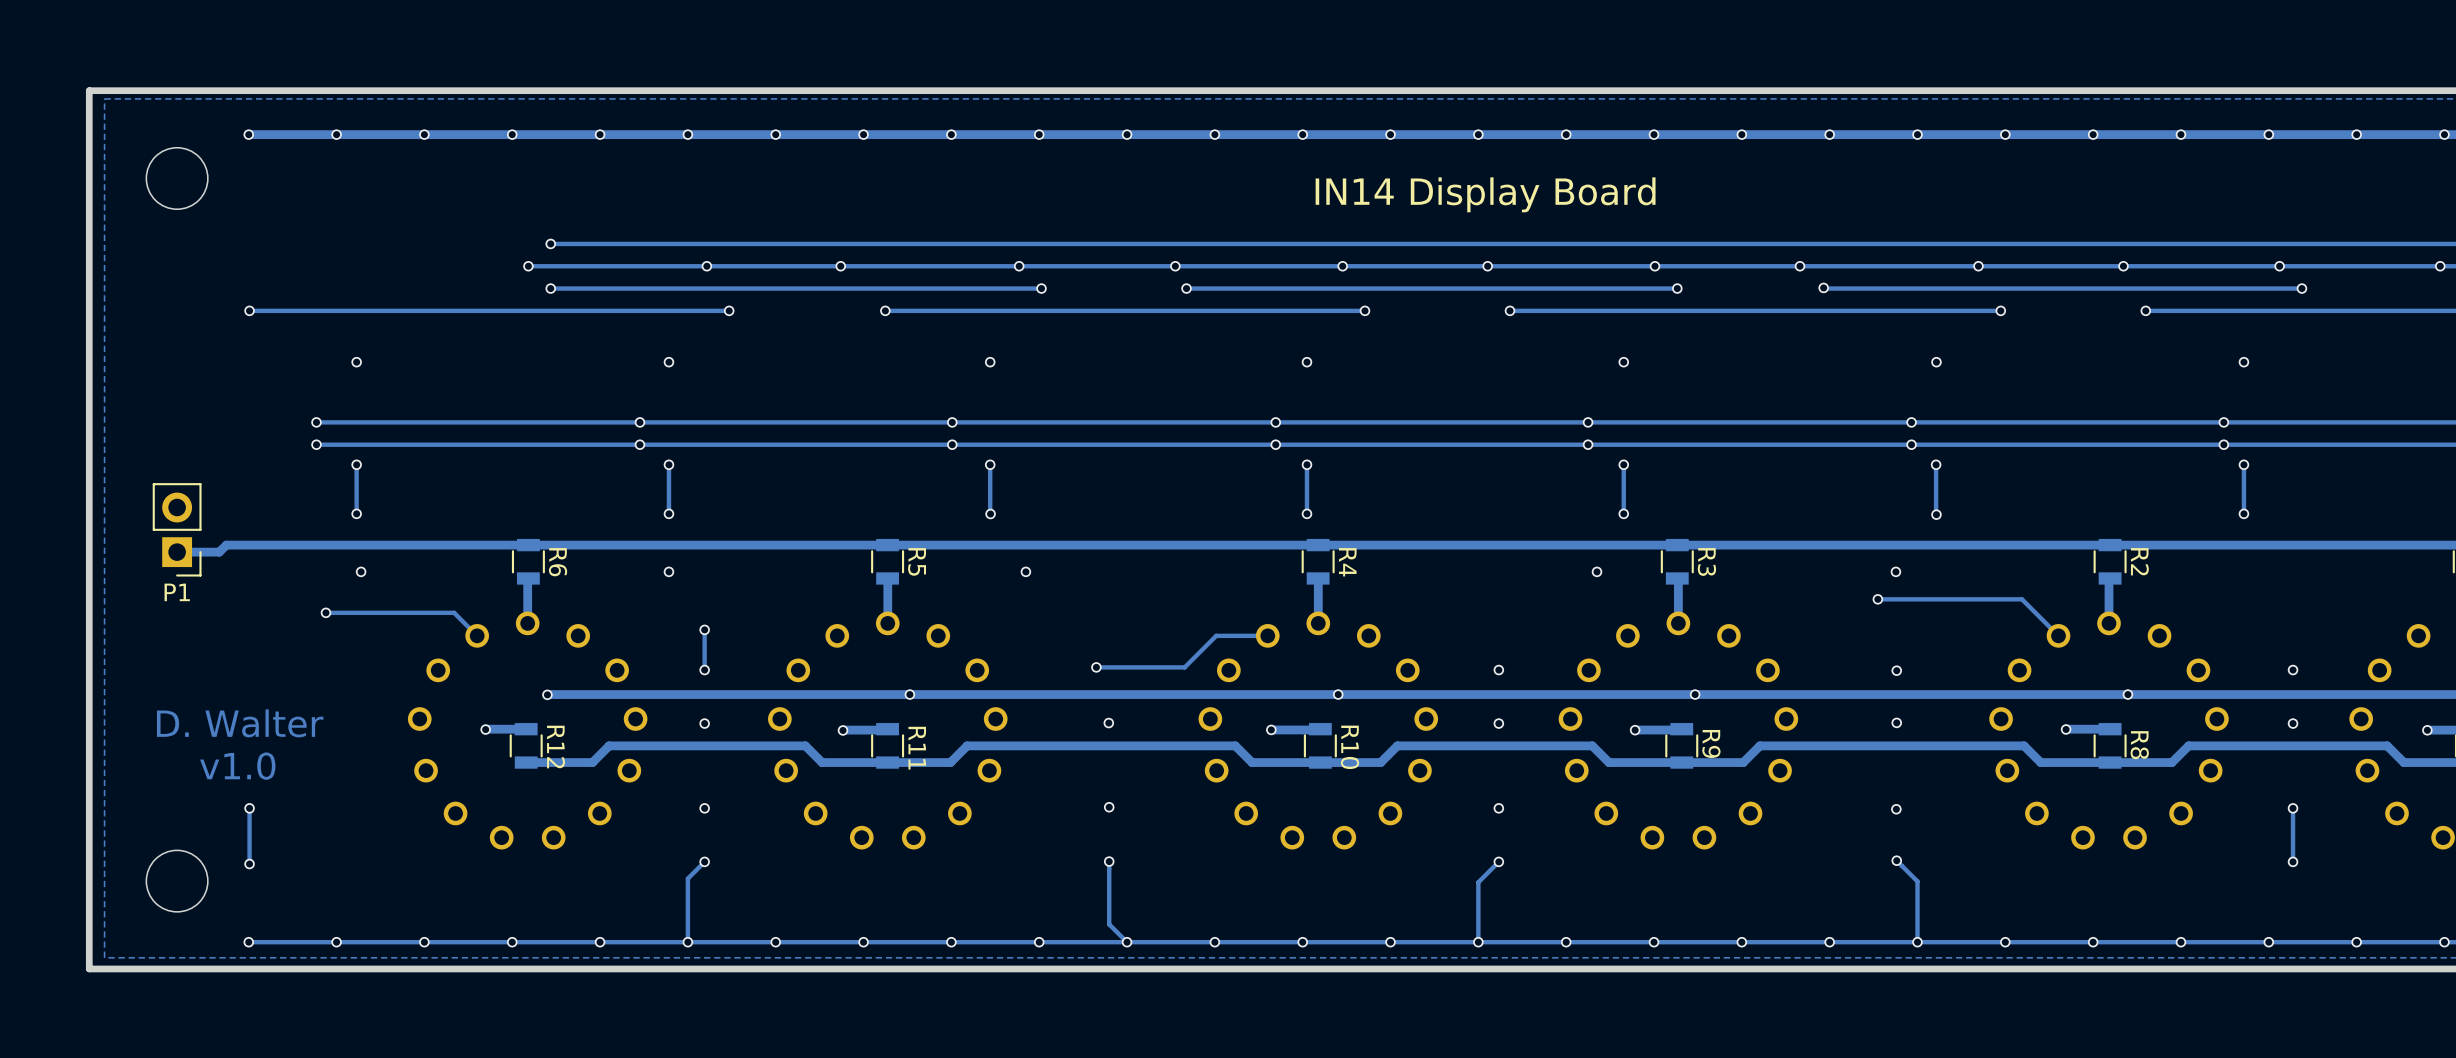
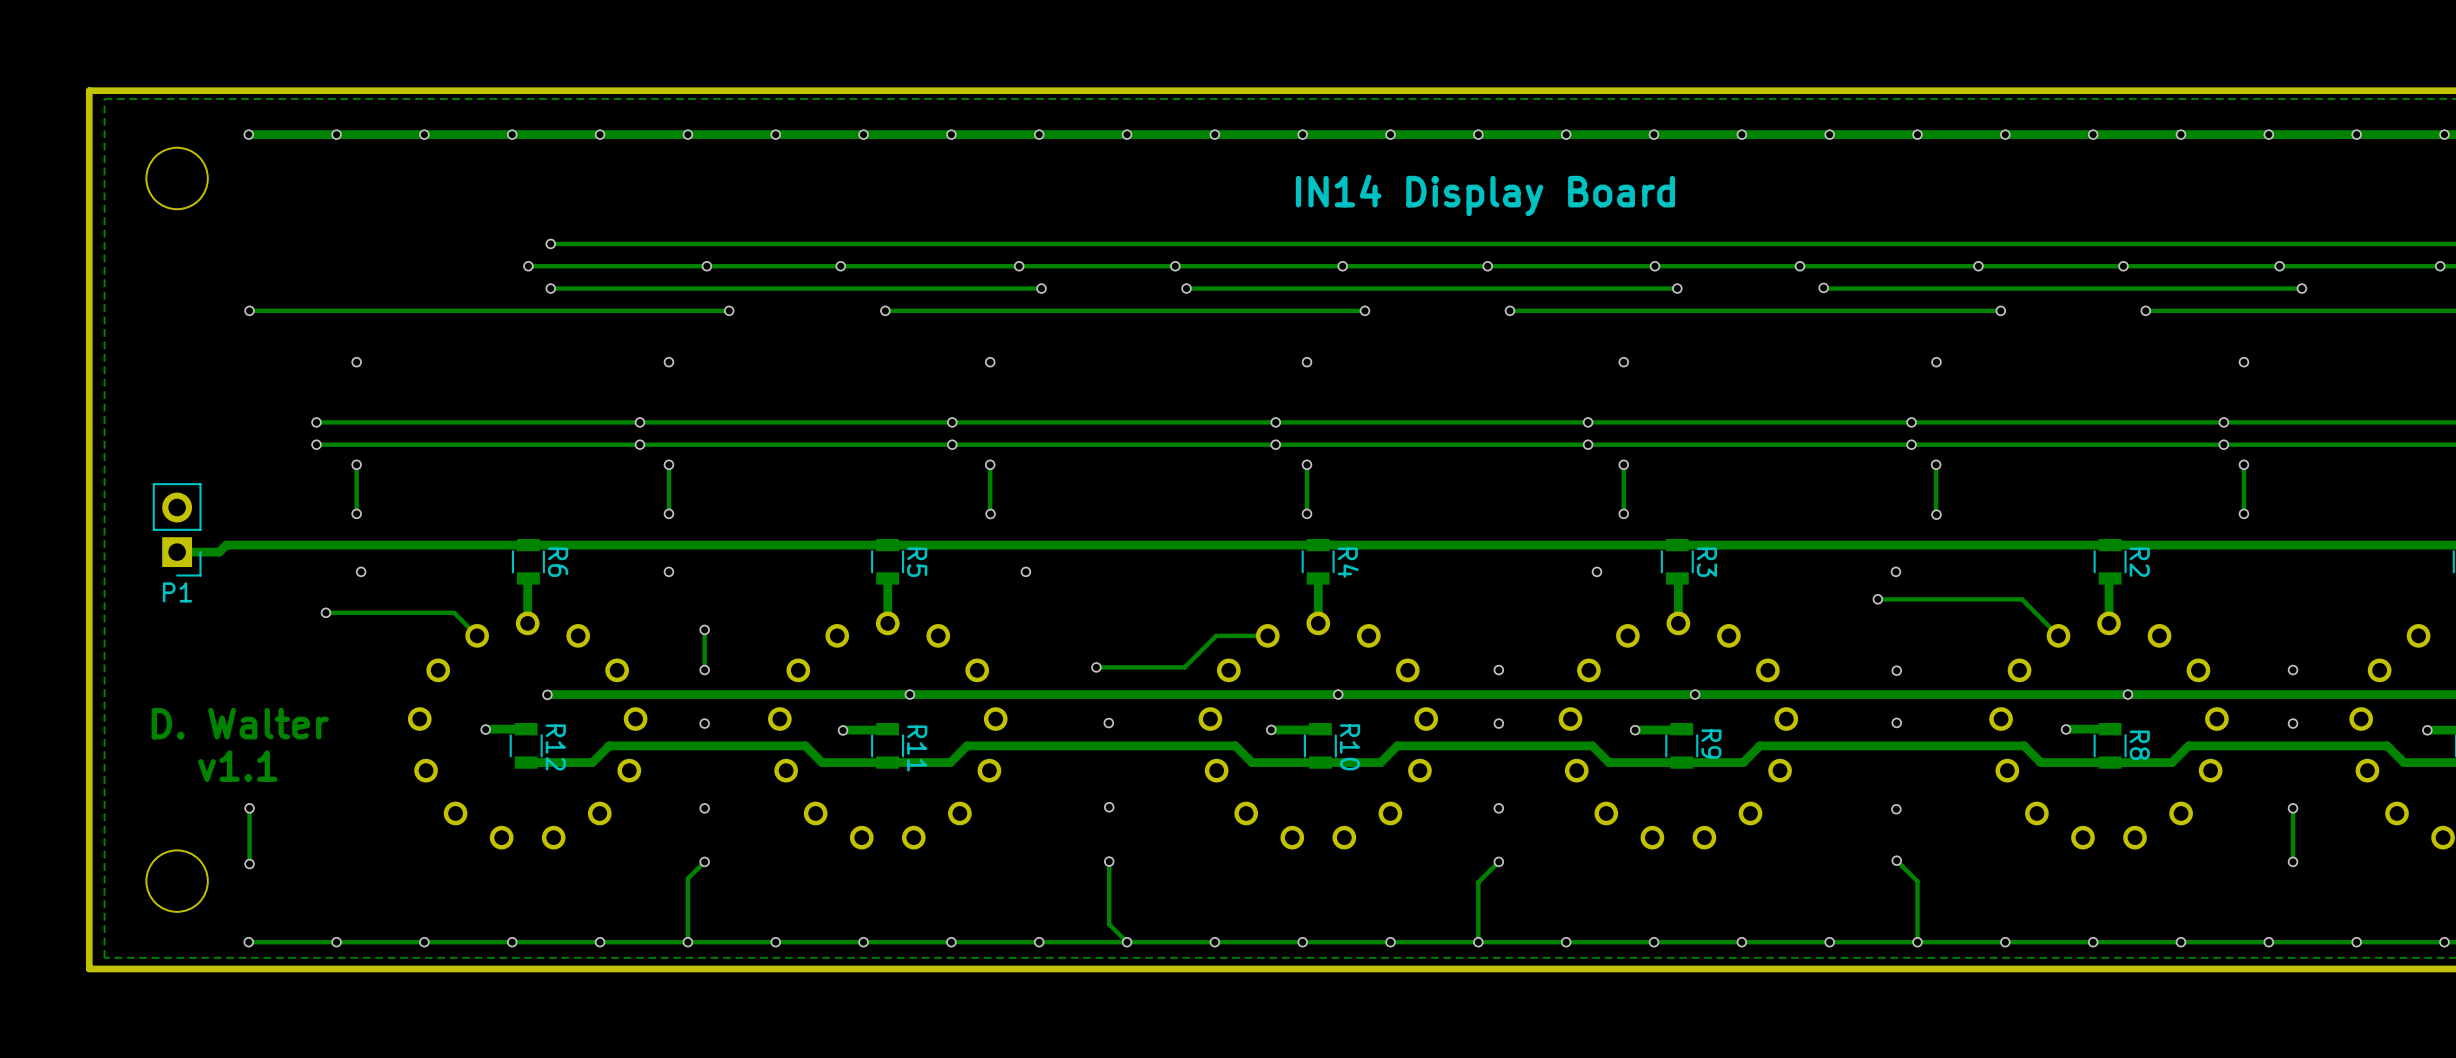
text: v1.0 (237, 766) -> v1.1 (237, 766)

